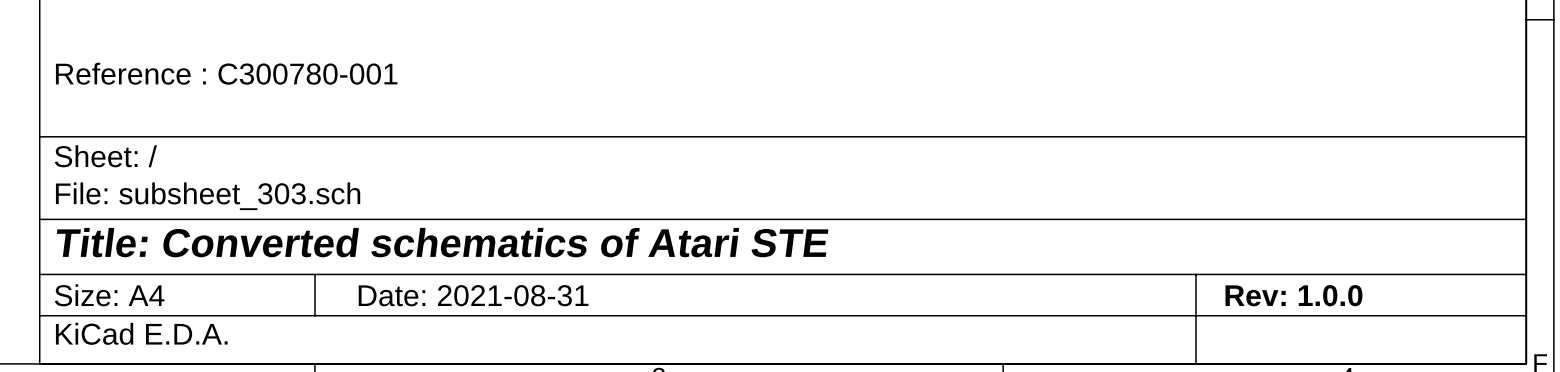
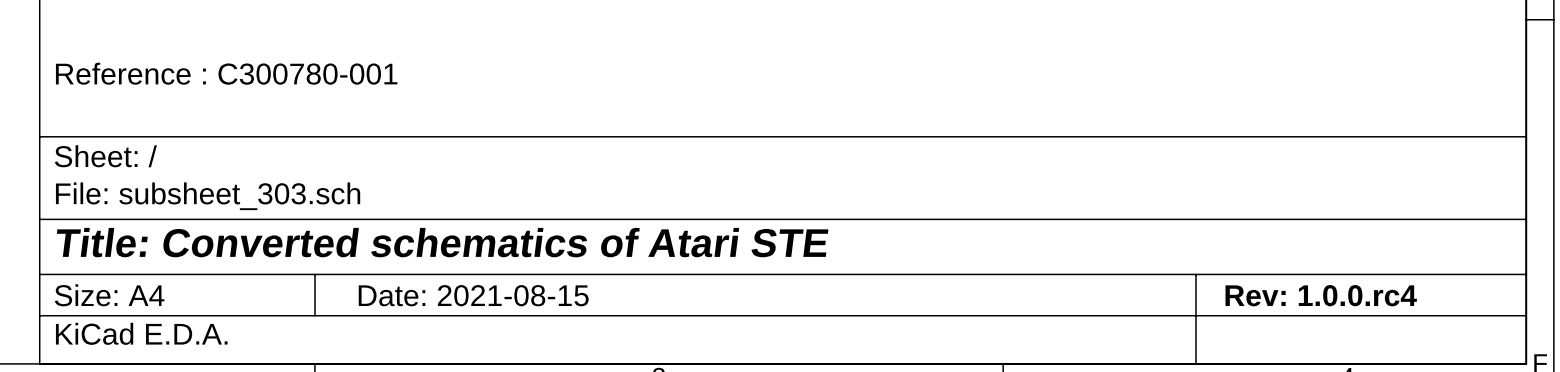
title block: Date: 2021-08-31 (473, 295) -> Date: 2021-08-15 (473, 295)
title block: Rev: 1.0.0 (1293, 295) -> Rev: 1.0.0.rc4 (1321, 295)

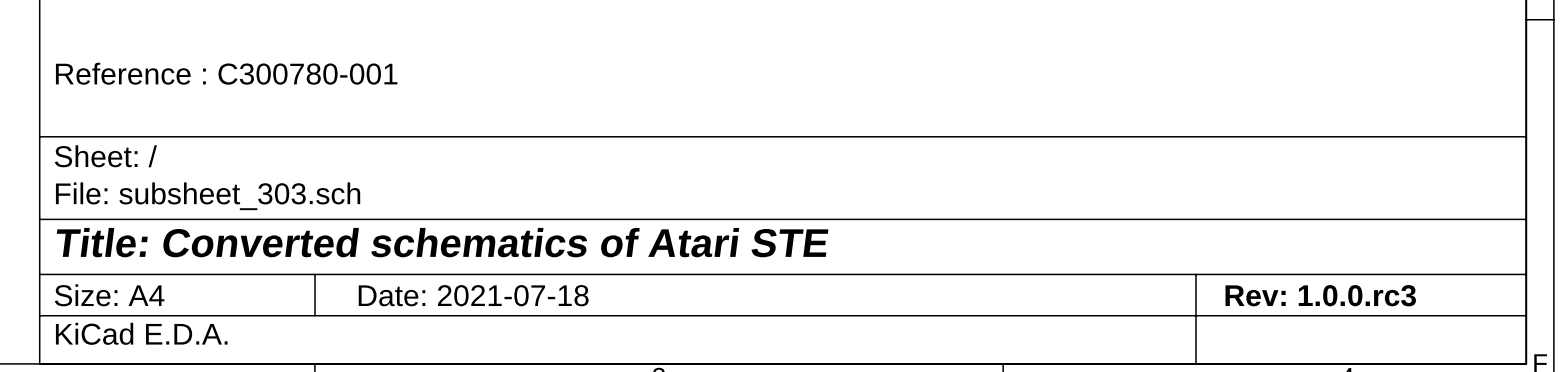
title block: Date: 2021-08-15 (473, 295) -> Date: 2021-07-18 (473, 295)
title block: Rev: 1.0.0.rc4 (1321, 295) -> Rev: 1.0.0.rc3 (1320, 295)

